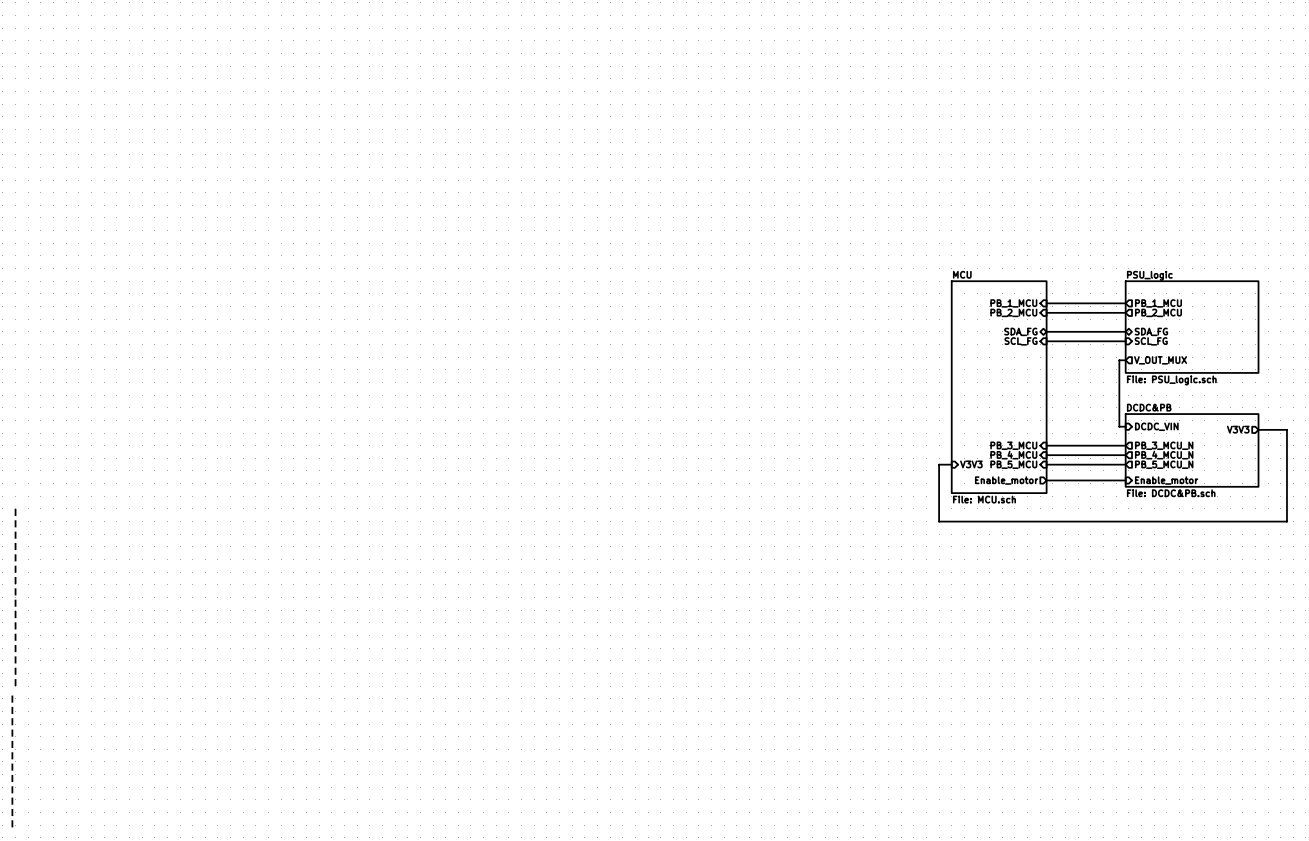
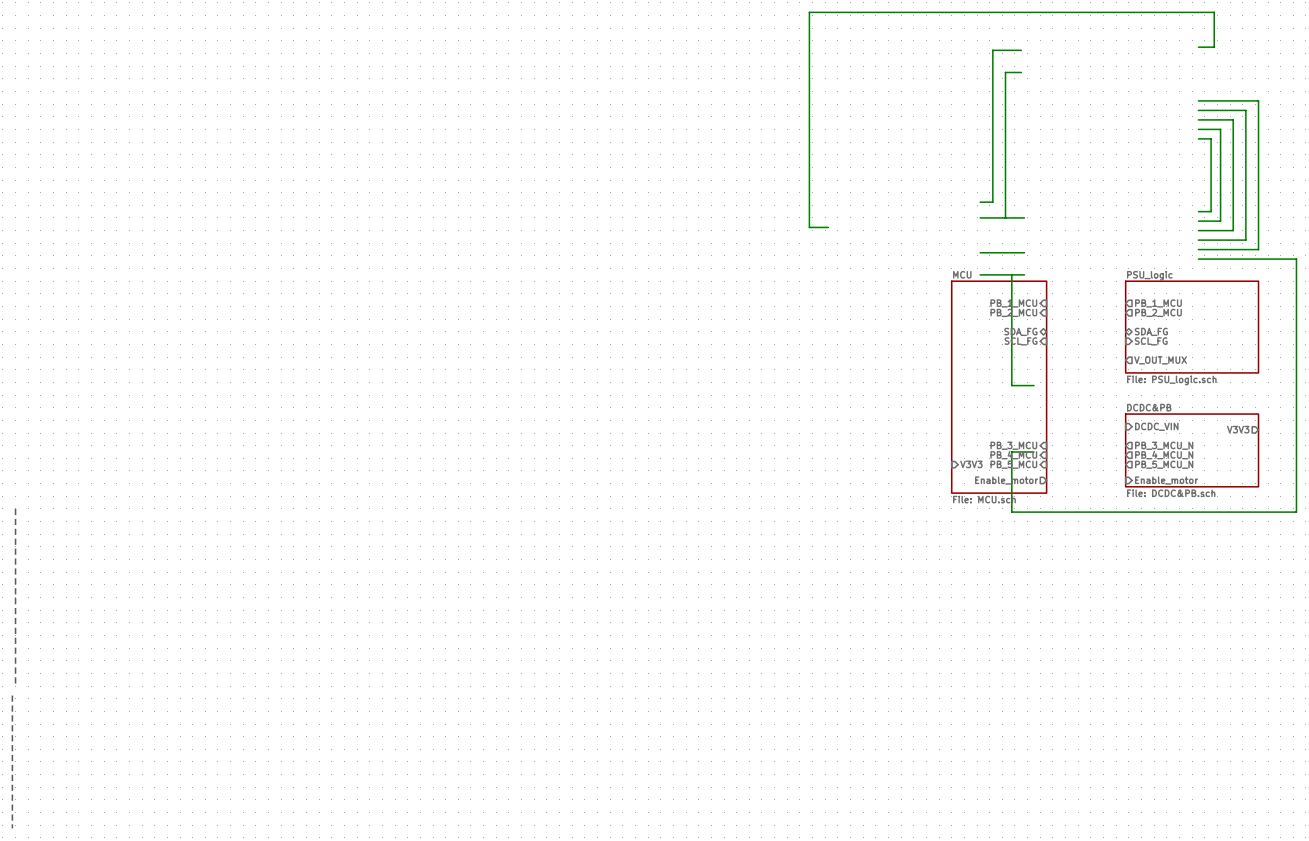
wire: none -> (1198, 47) (1214, 47) (1214, 12) (809, 12) (809, 227) (828, 227)
wire: none -> (1021, 50) (992, 50) (992, 202) (980, 202)
wire: none -> (1021, 72) (1005, 72) (1005, 217)
wire: none -> (1198, 100) (1258, 100) (1258, 249) (1198, 249)
wire: none -> (1198, 110) (1245, 110) (1245, 240) (1198, 240)
wire: none -> (1198, 119) (1233, 119) (1233, 230) (1198, 230)
wire: none -> (1198, 129) (1220, 129) (1220, 221) (1198, 221)
wire: none -> (1198, 138) (1211, 138) (1211, 211) (1198, 211)
wire: none -> (980, 217) (1024, 217)
wire: none -> (980, 252) (1024, 252)
wire: none -> (1198, 259) (1296, 259) (1296, 512) (1011, 512) (1011, 452) (1033, 452)
wire: none -> (980, 274) (1024, 274)
wire: none -> (1011, 274) (1011, 385) (1033, 385)
wire: (1046, 303) (1125, 303) -> none
wire: (1046, 312) (1125, 312) -> none
wire: (1046, 331) (1125, 331) -> none
wire: (1046, 341) (1125, 341) -> none
wire: (1125, 360) (1119, 360) (1119, 426) (1125, 426) -> none
wire: (1258, 429) (1286, 429) (1286, 521) (939, 521) (939, 464) (951, 464) -> none
wire: (1046, 445) (1125, 445) -> none
wire: (1046, 455) (1125, 455) -> none
wire: (1046, 464) (1125, 464) -> none
wire: (1046, 480) (1125, 480) -> none

